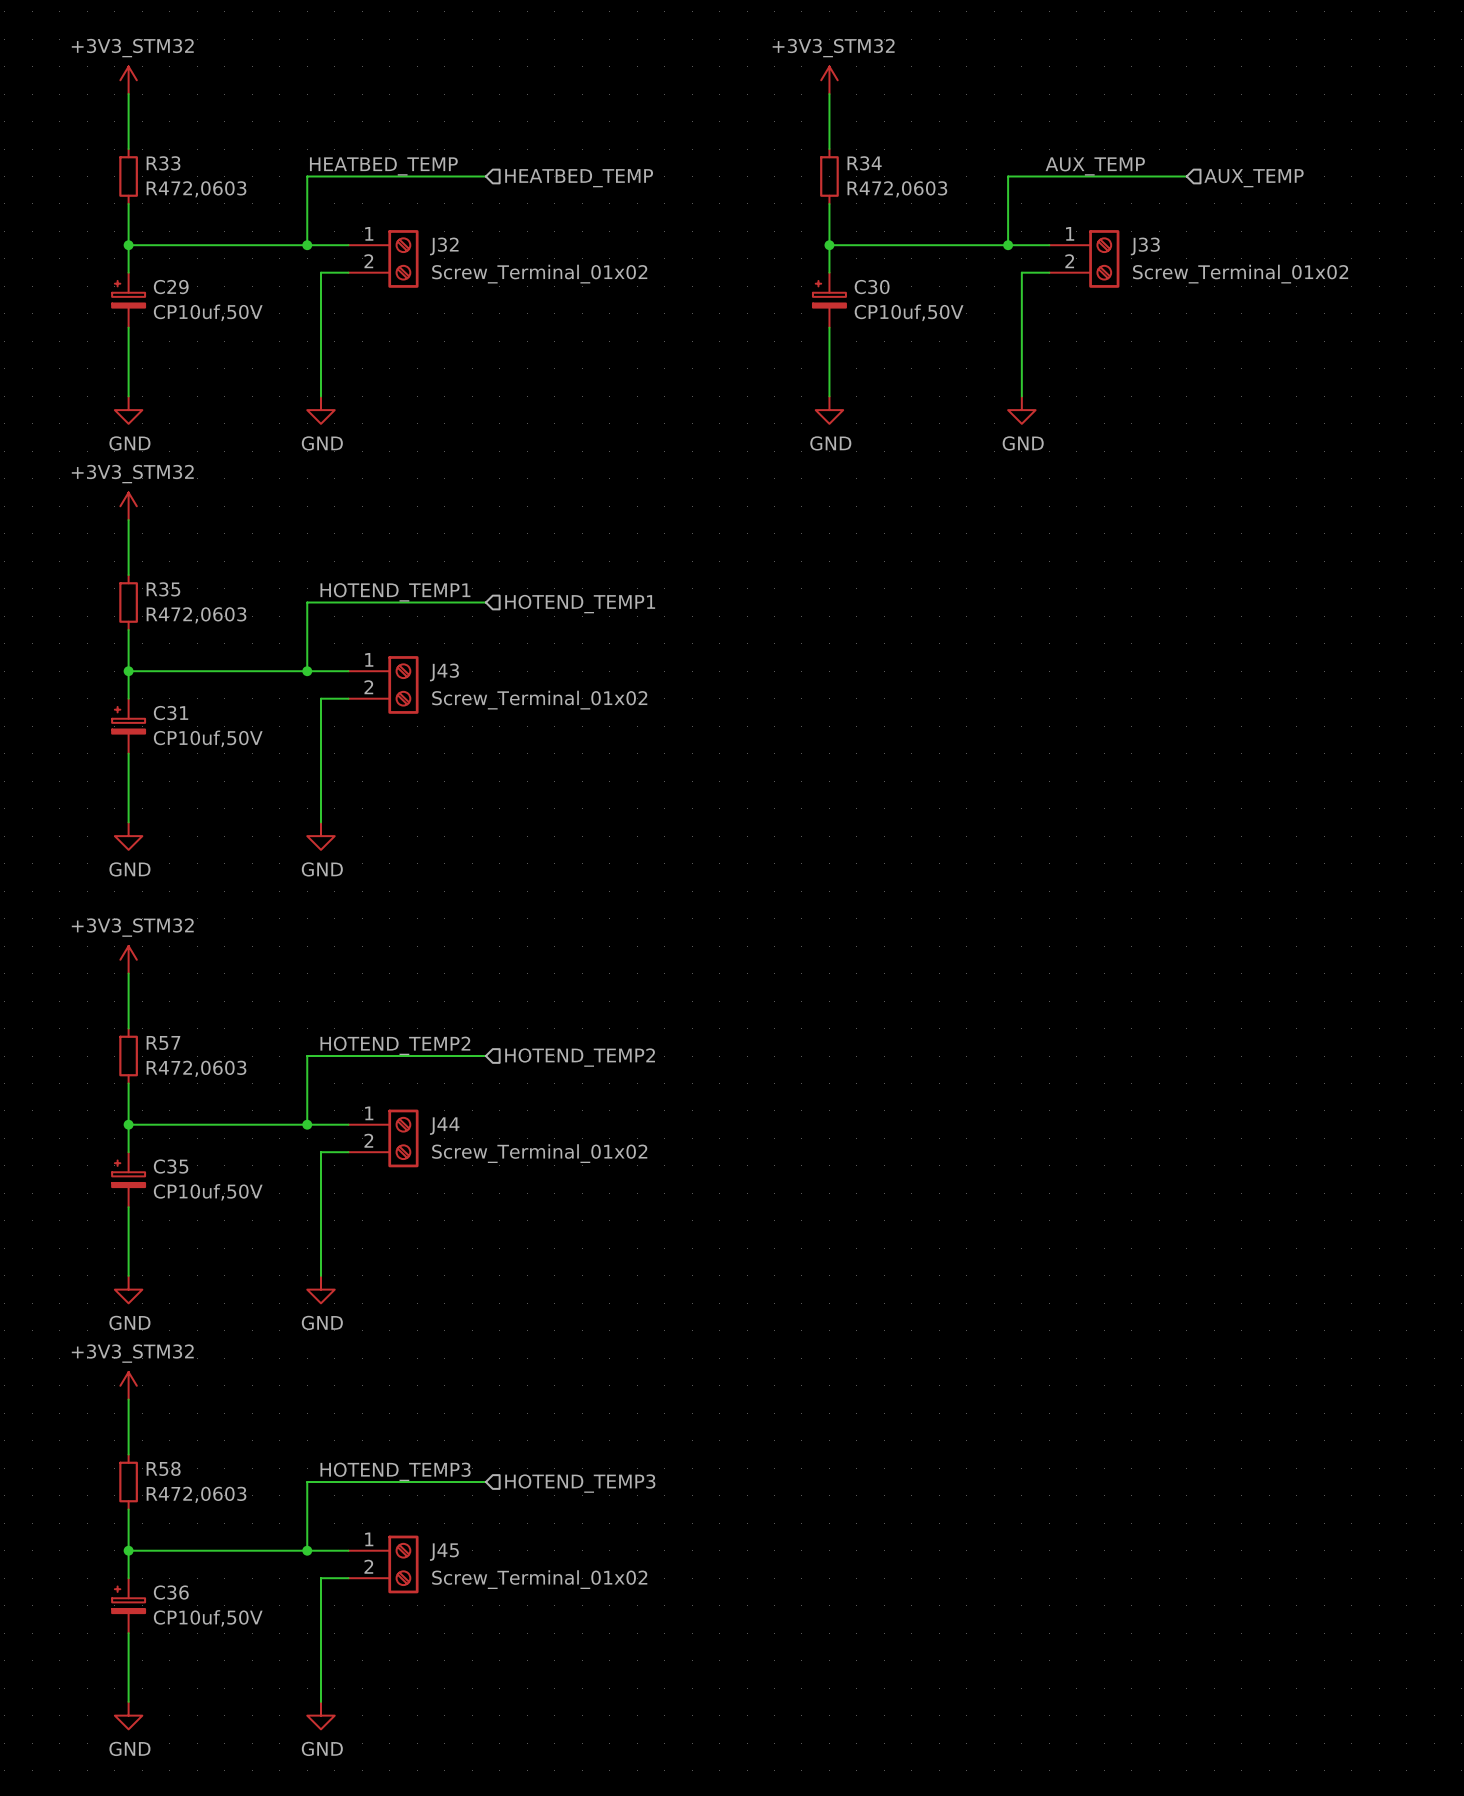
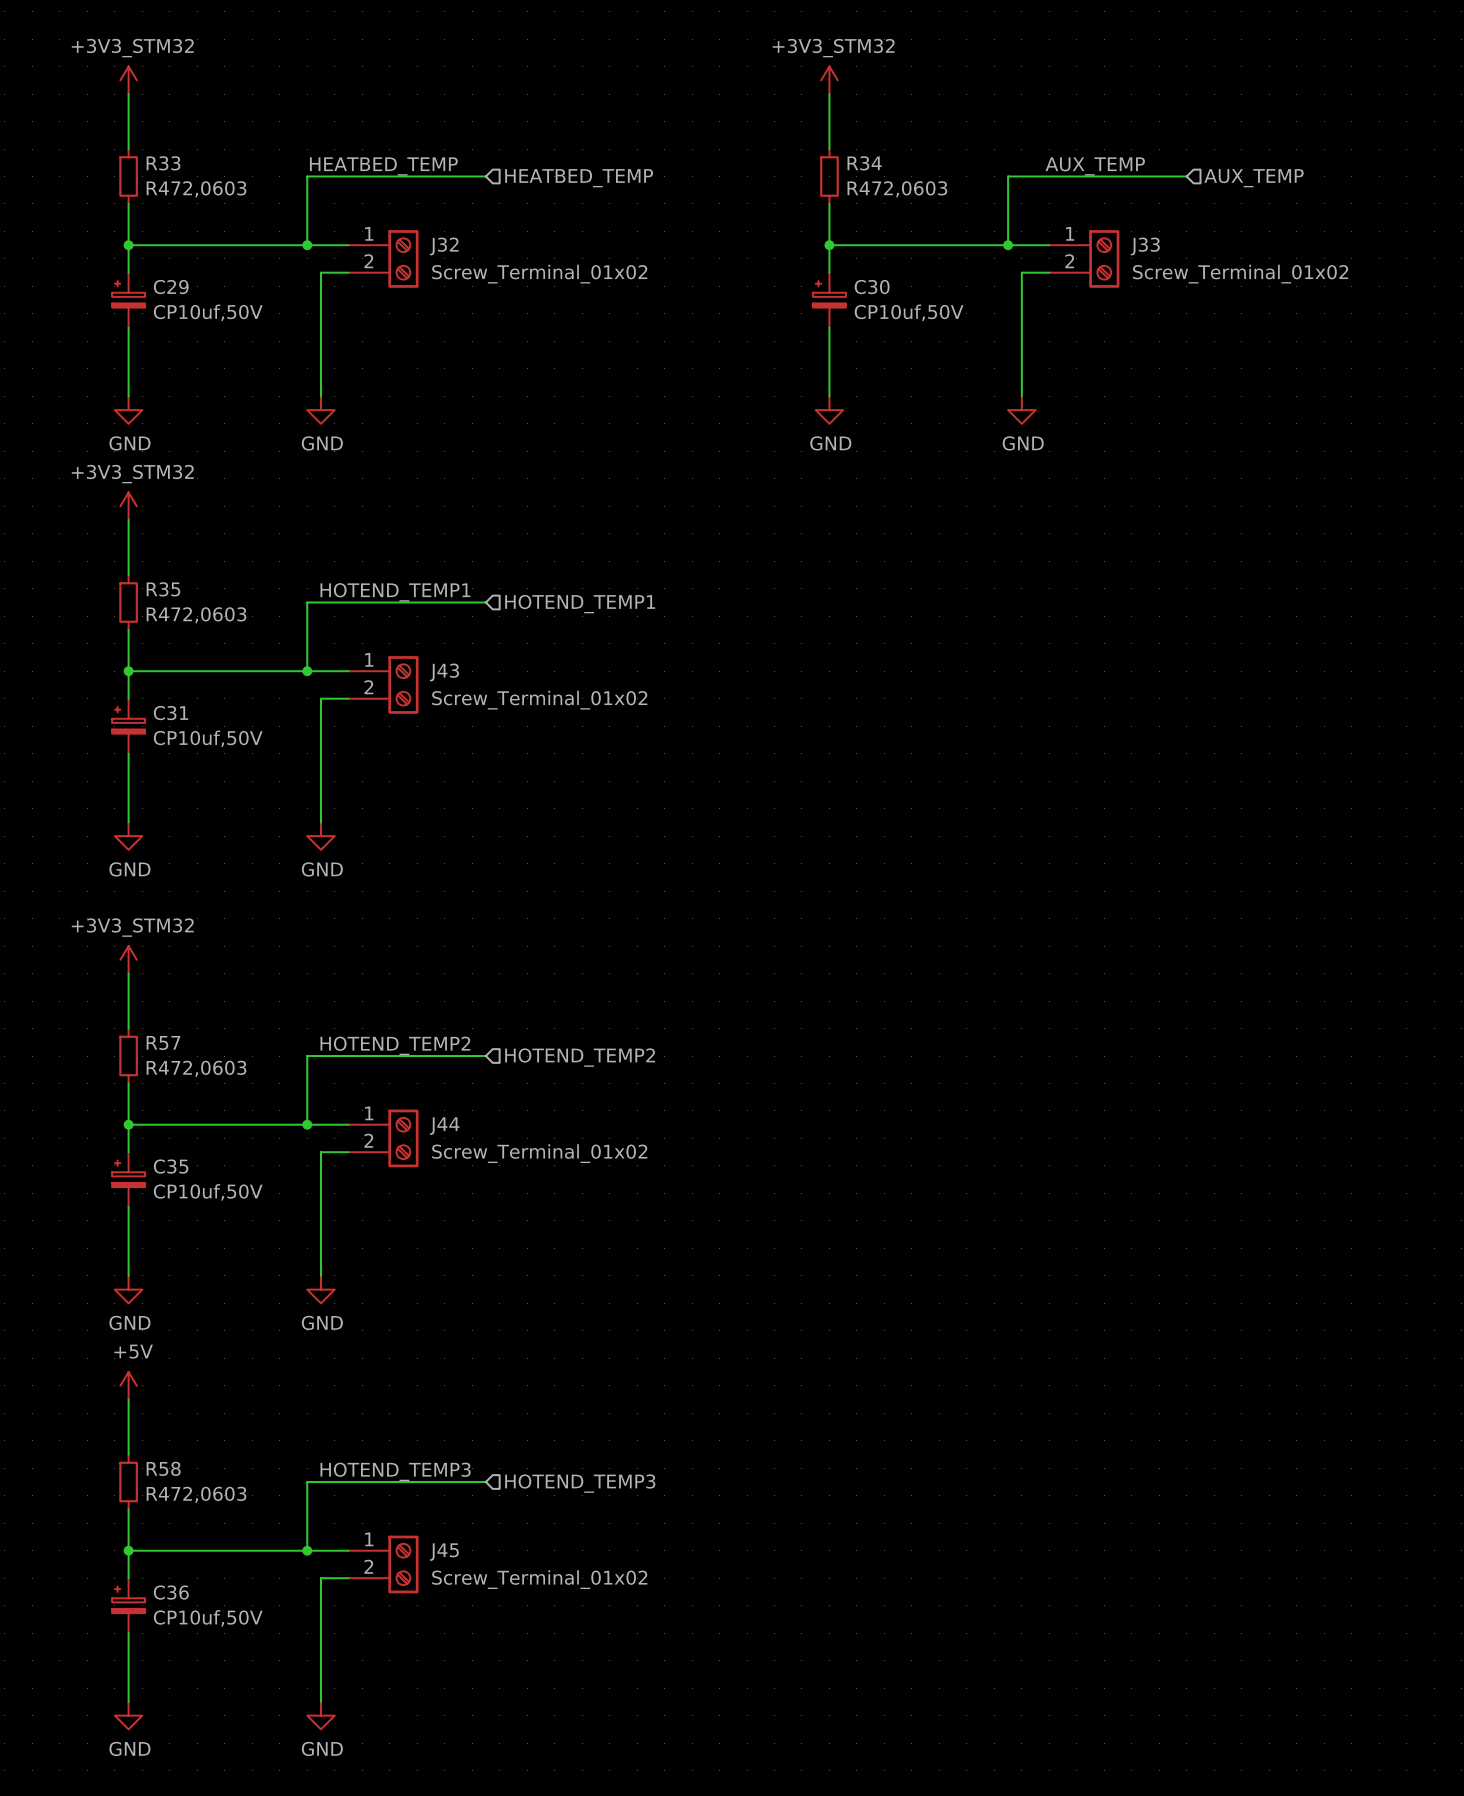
power symbol: +3V3_STM32 (128, 1385) -> +5V (128, 1385)

